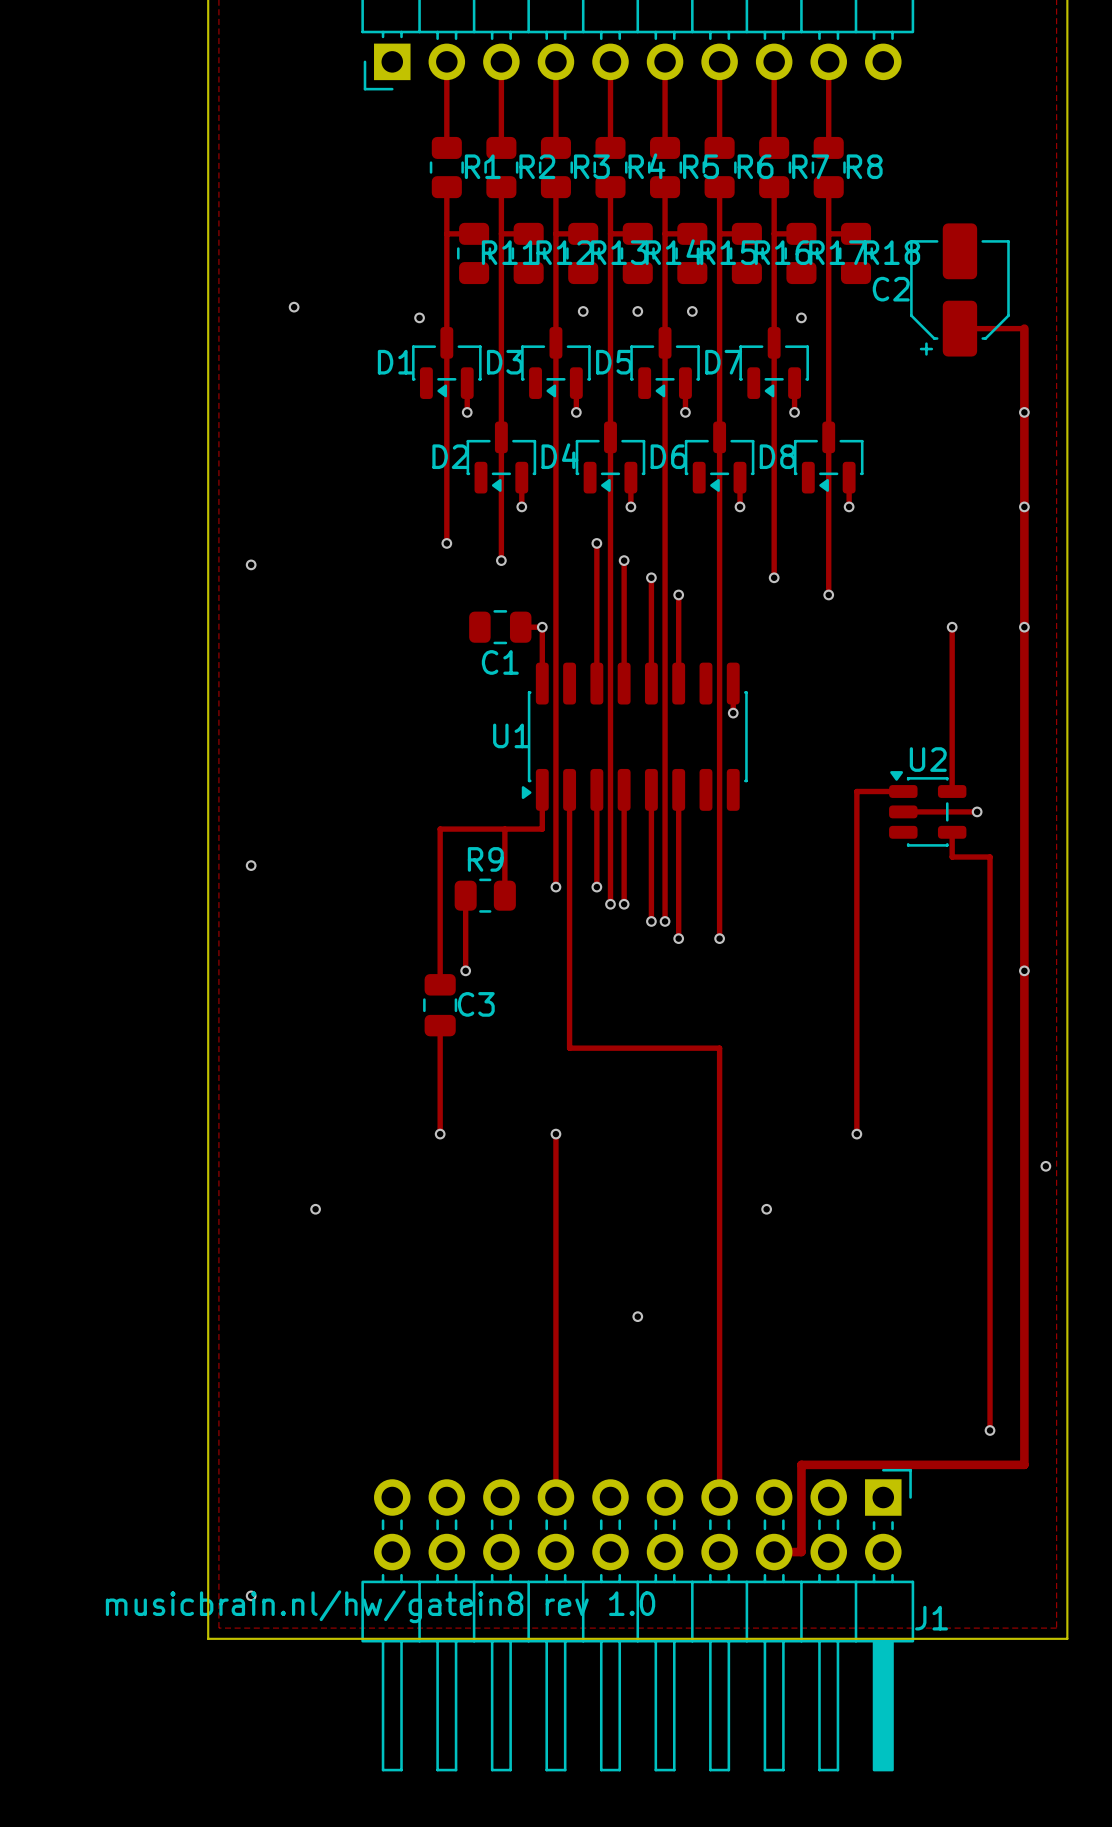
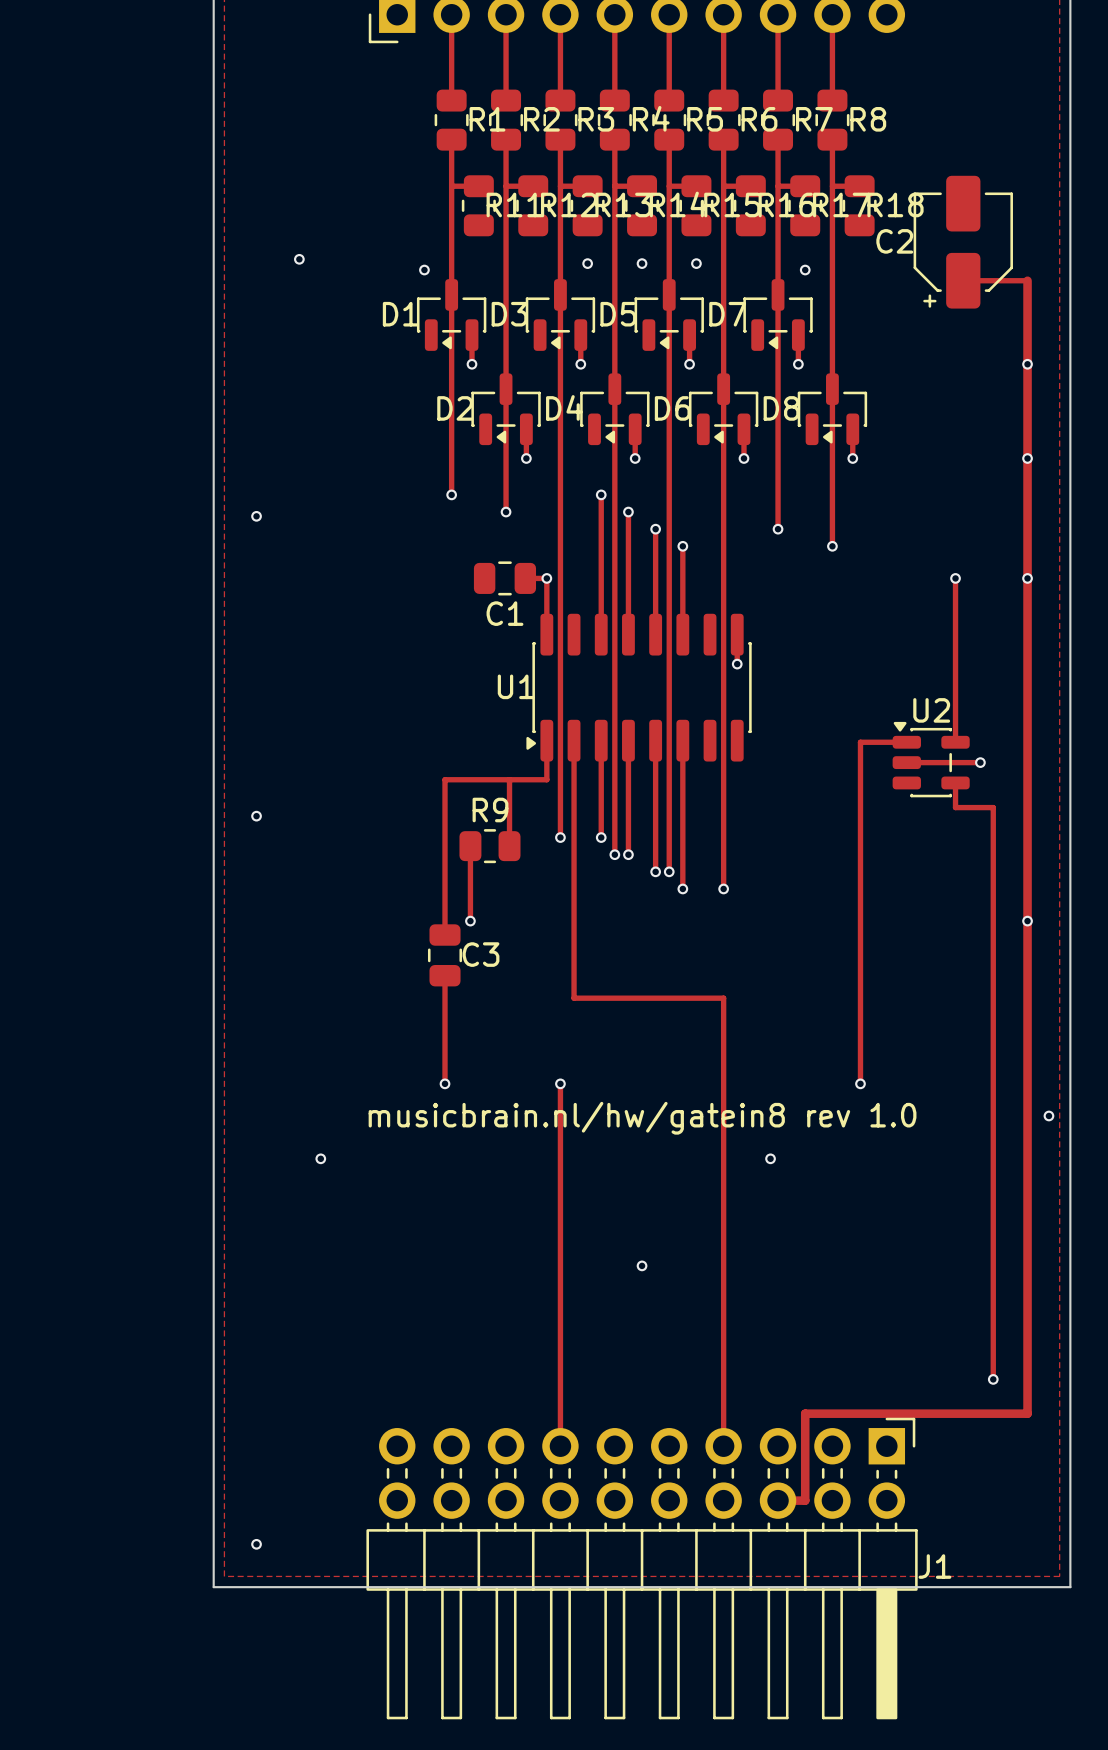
text position: musicbrain.nl/hw/gatein8 rev 1.0 (380, 1606) -> musicbrain.nl/hw/gatein8 rev 1.0 (642, 1118)

